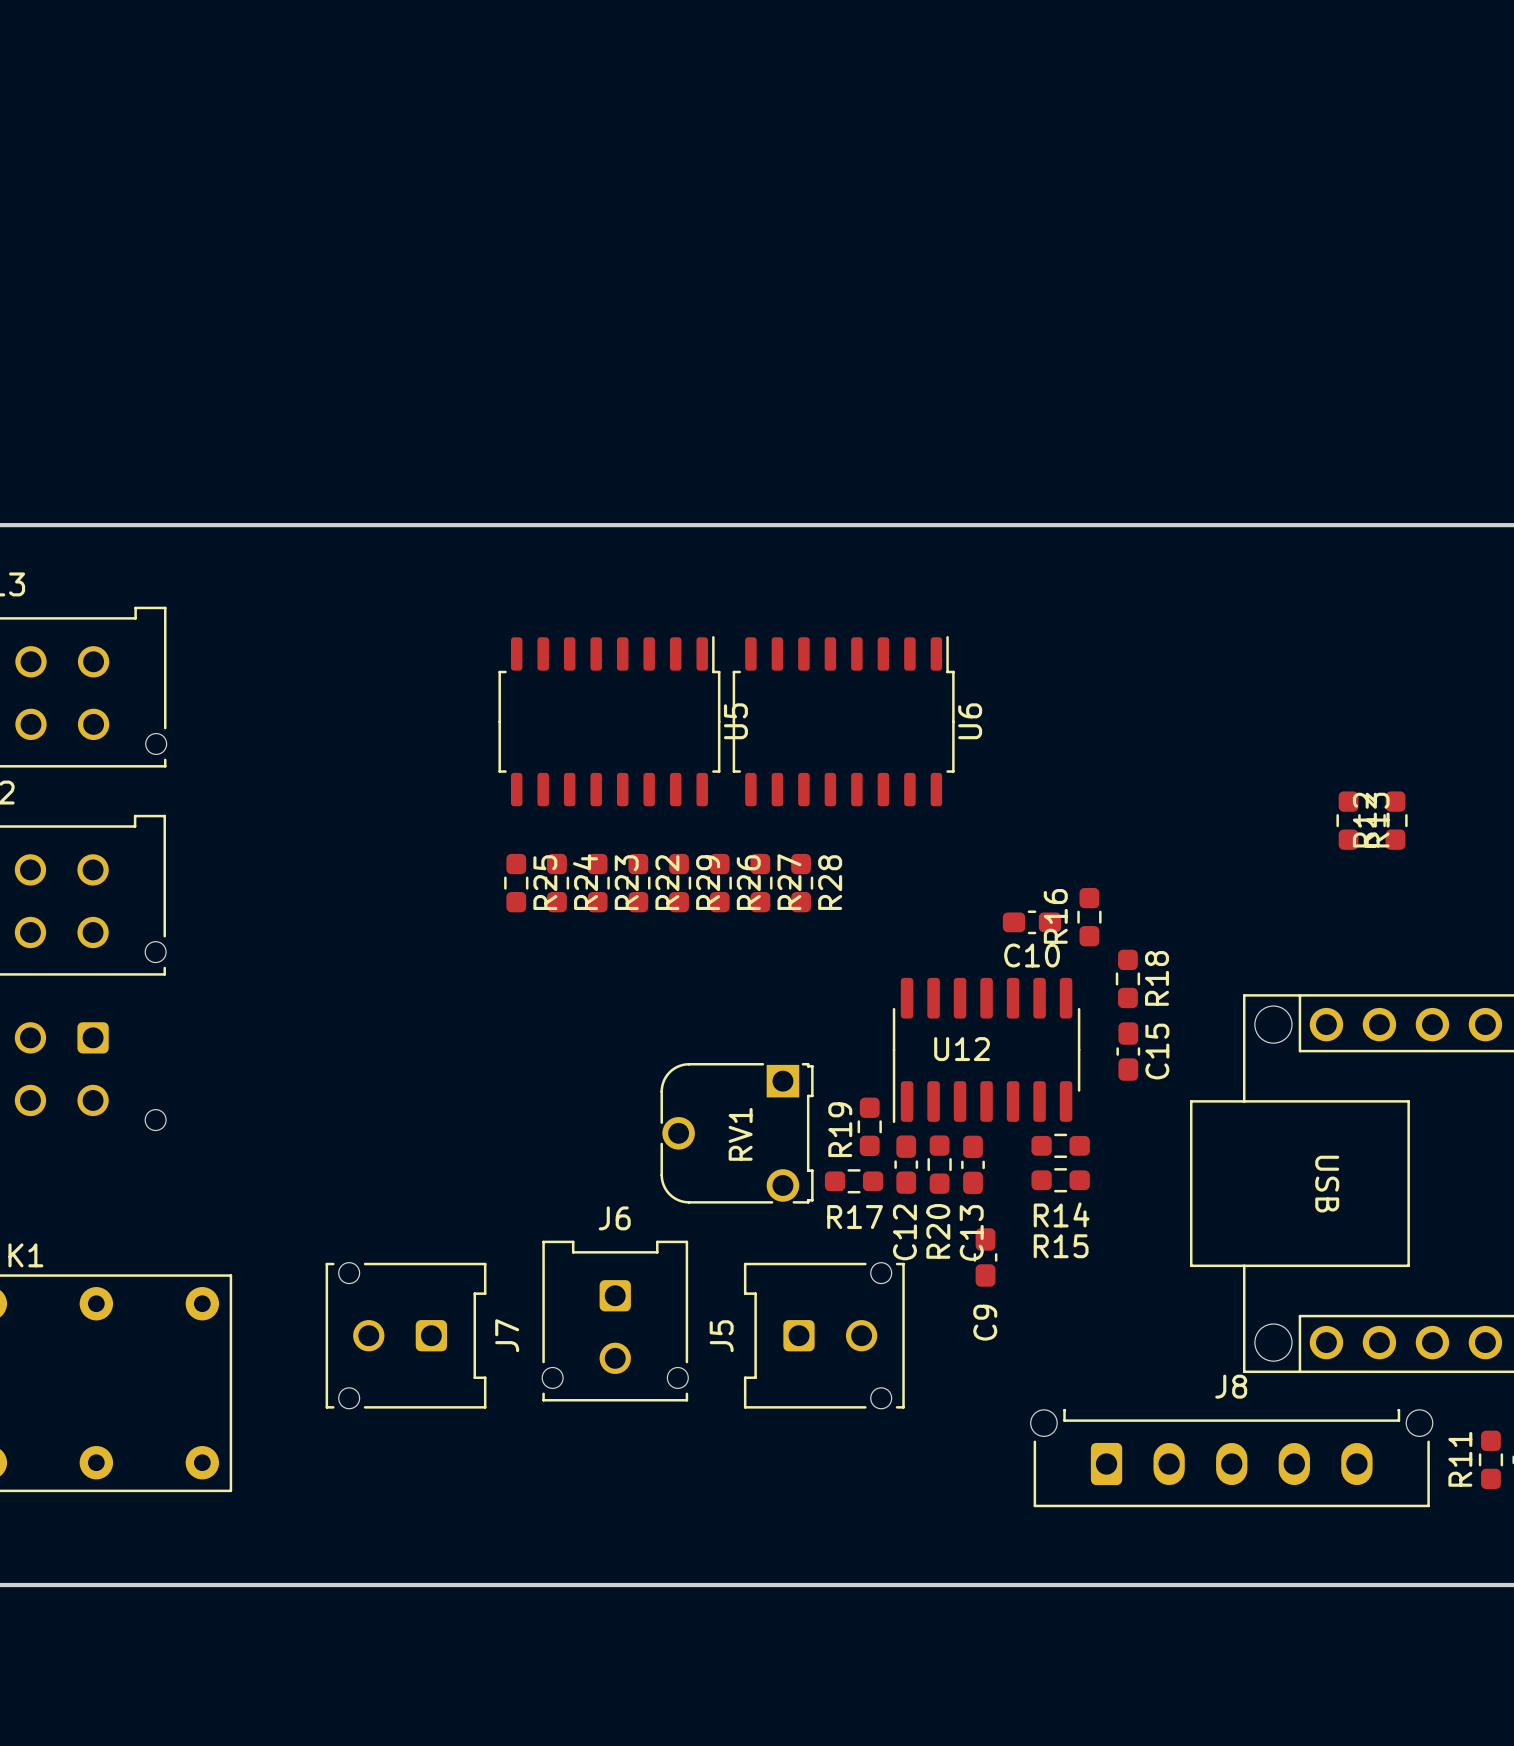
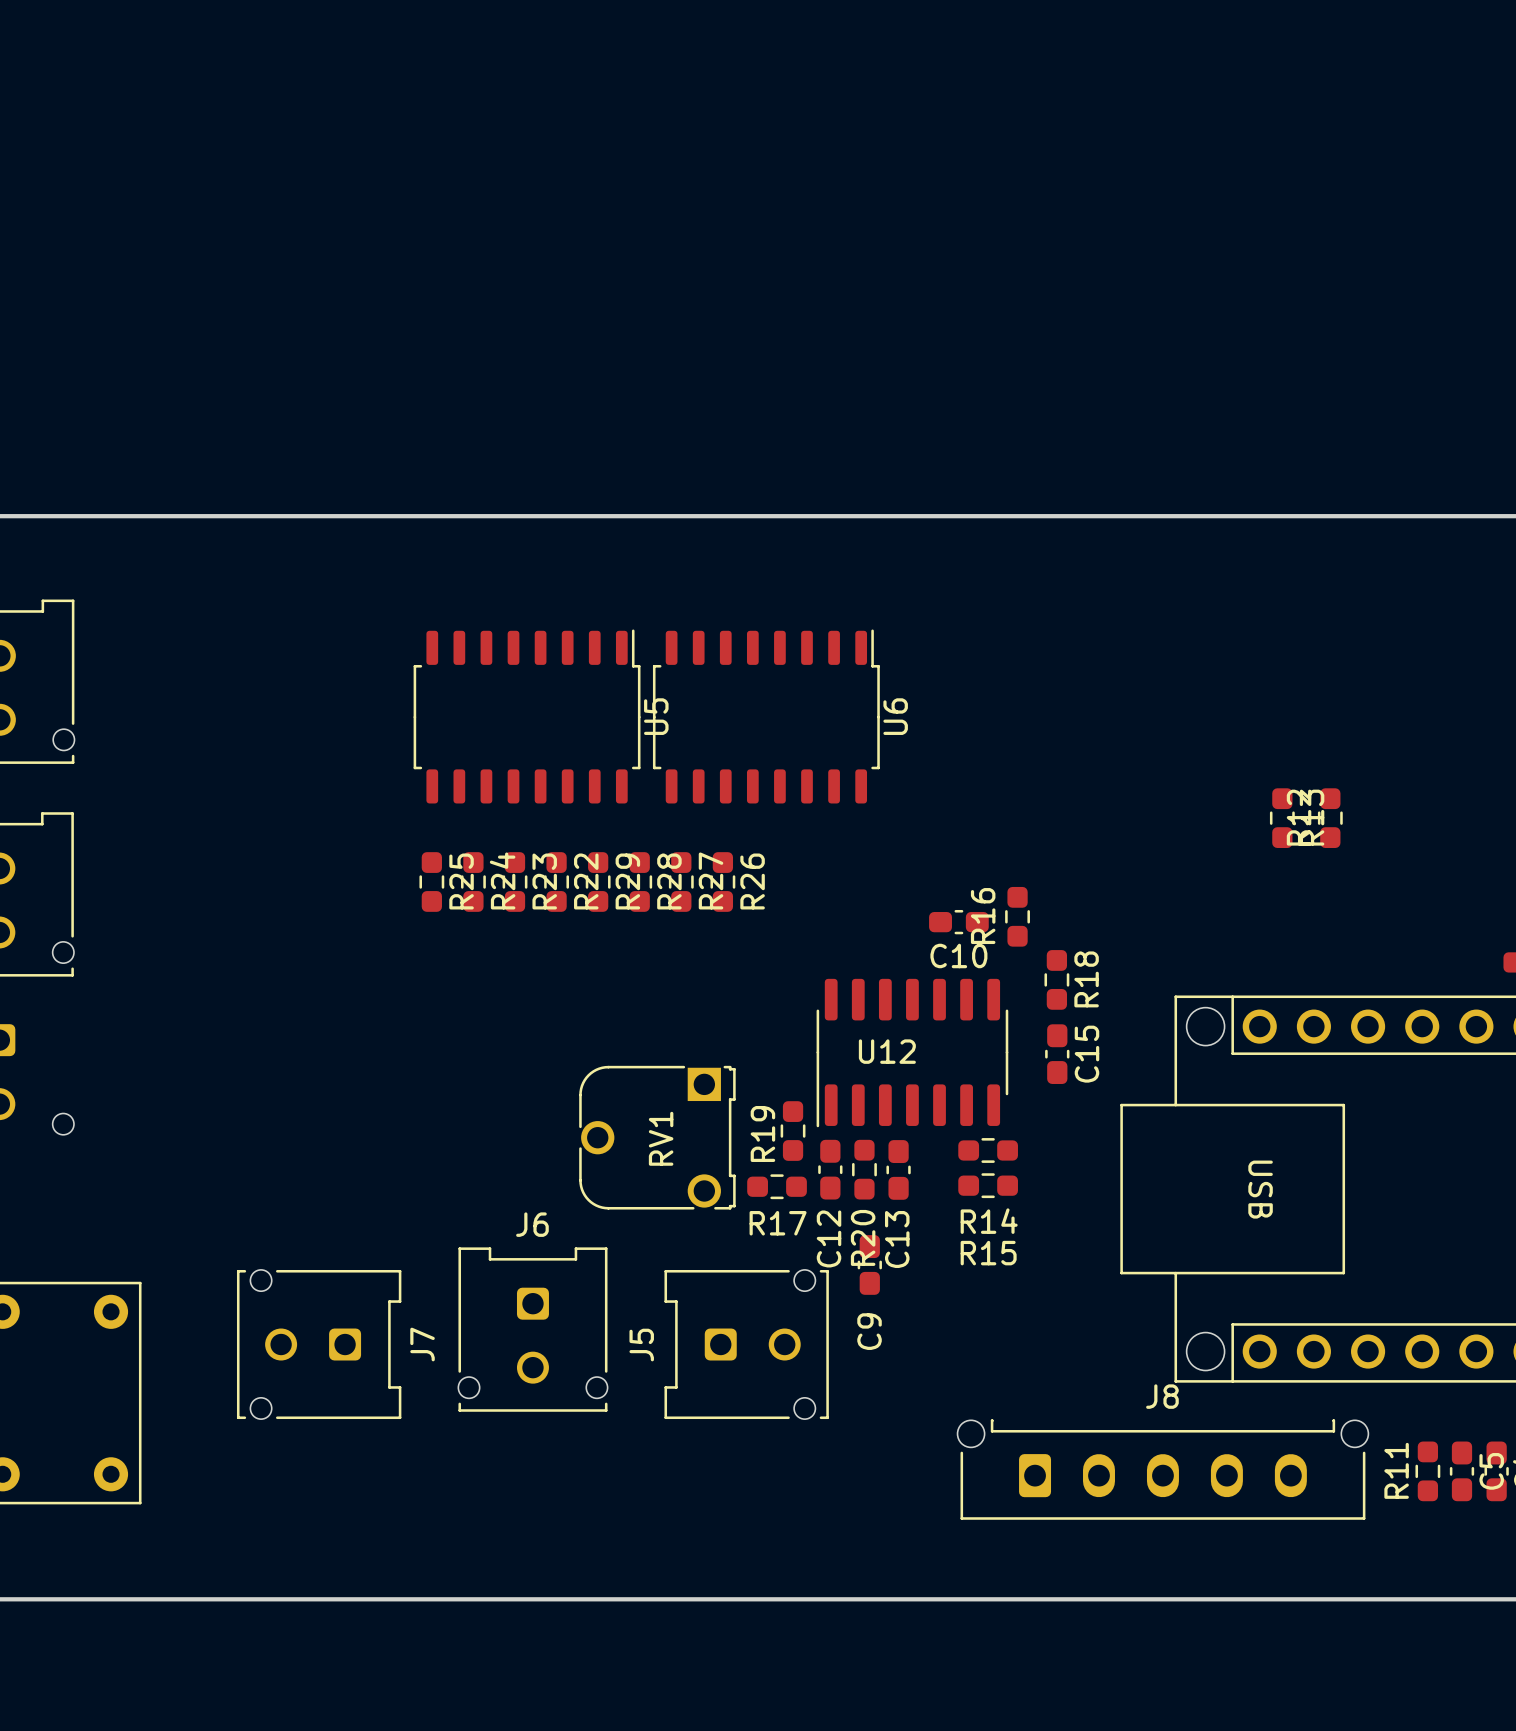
R26 name: R26 (748, 882) -> R28 (669, 881)
R28 name: R28 (830, 882) -> R26 (752, 881)
C9 position: (985, 1257) -> (869, 1264)

